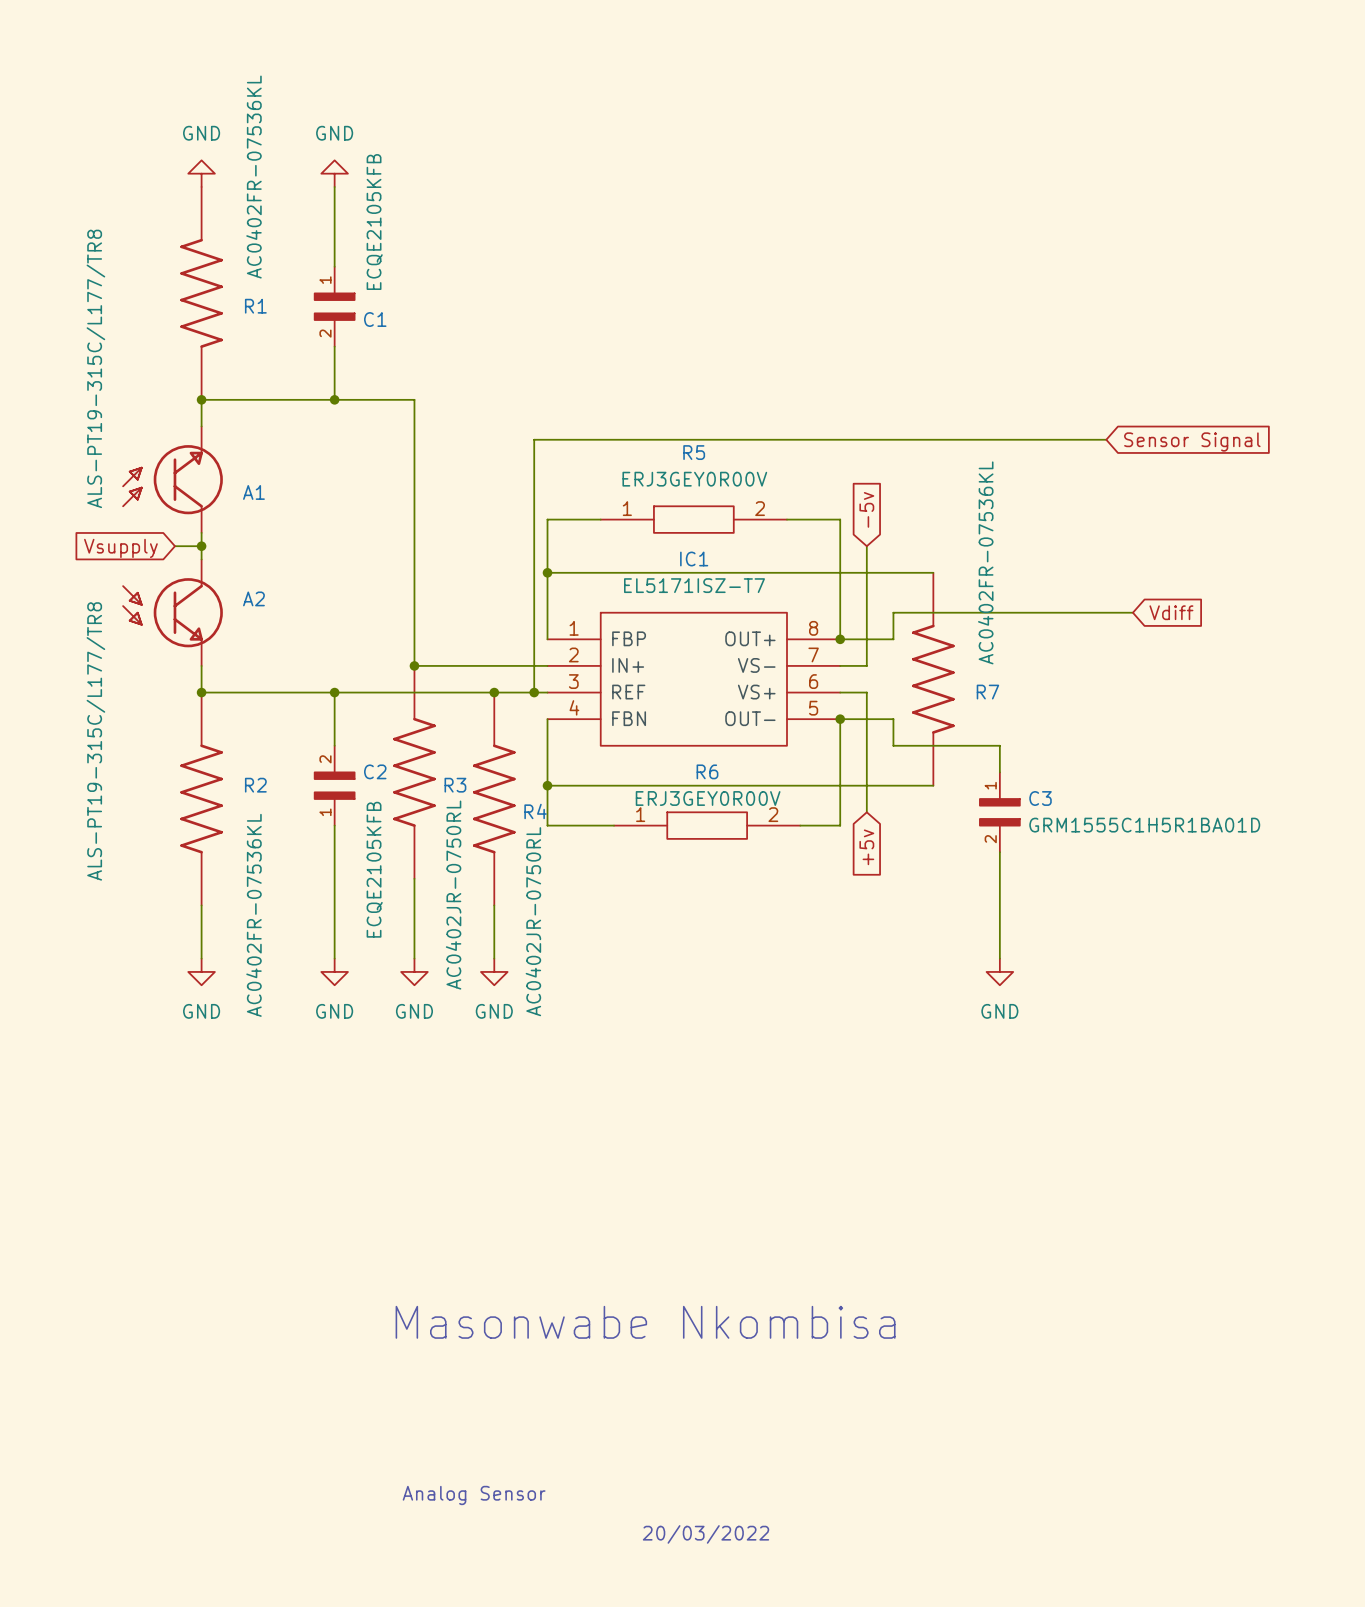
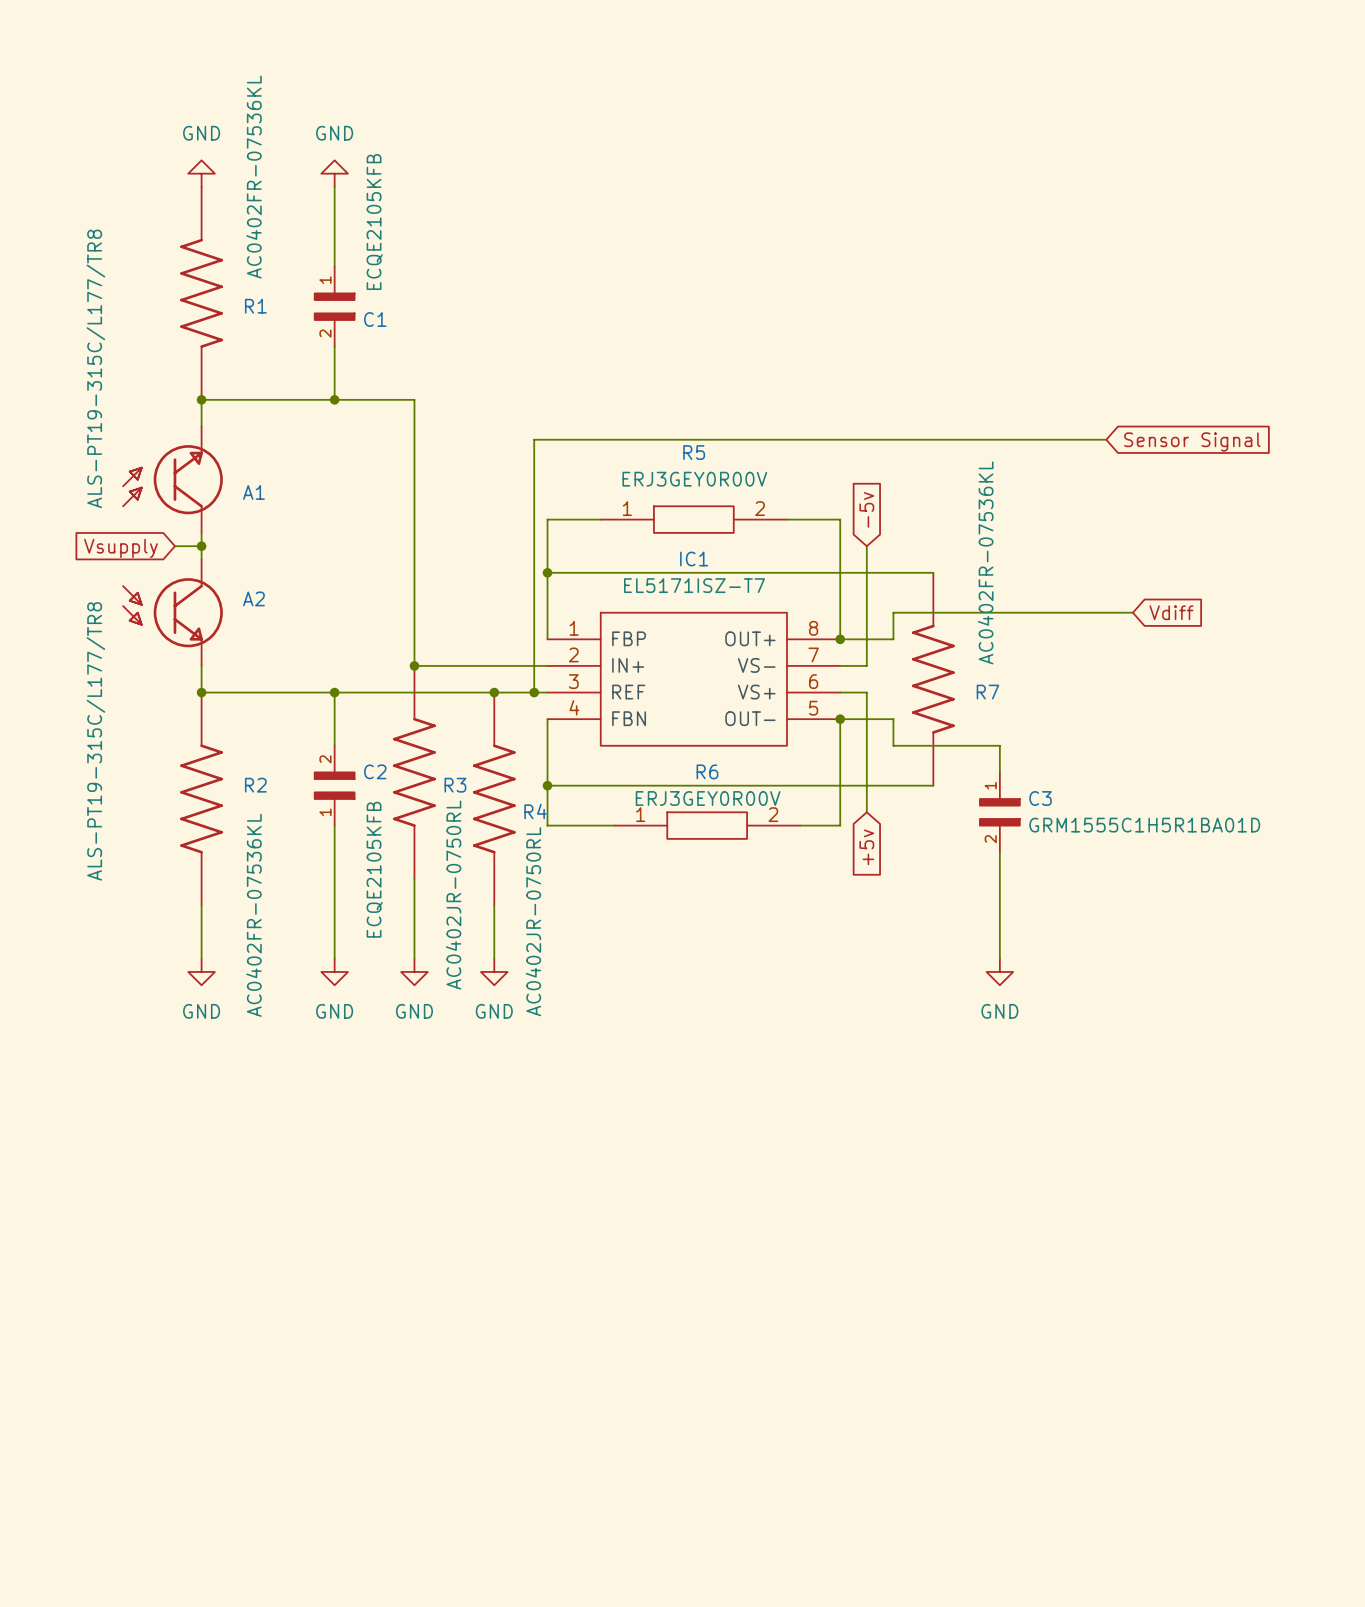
text: Masonwabe Nkombisa (645, 1322) -> none
text: Analog Sensor (474, 1495) -> none
text: 20/03/2022 (706, 1534) -> none

